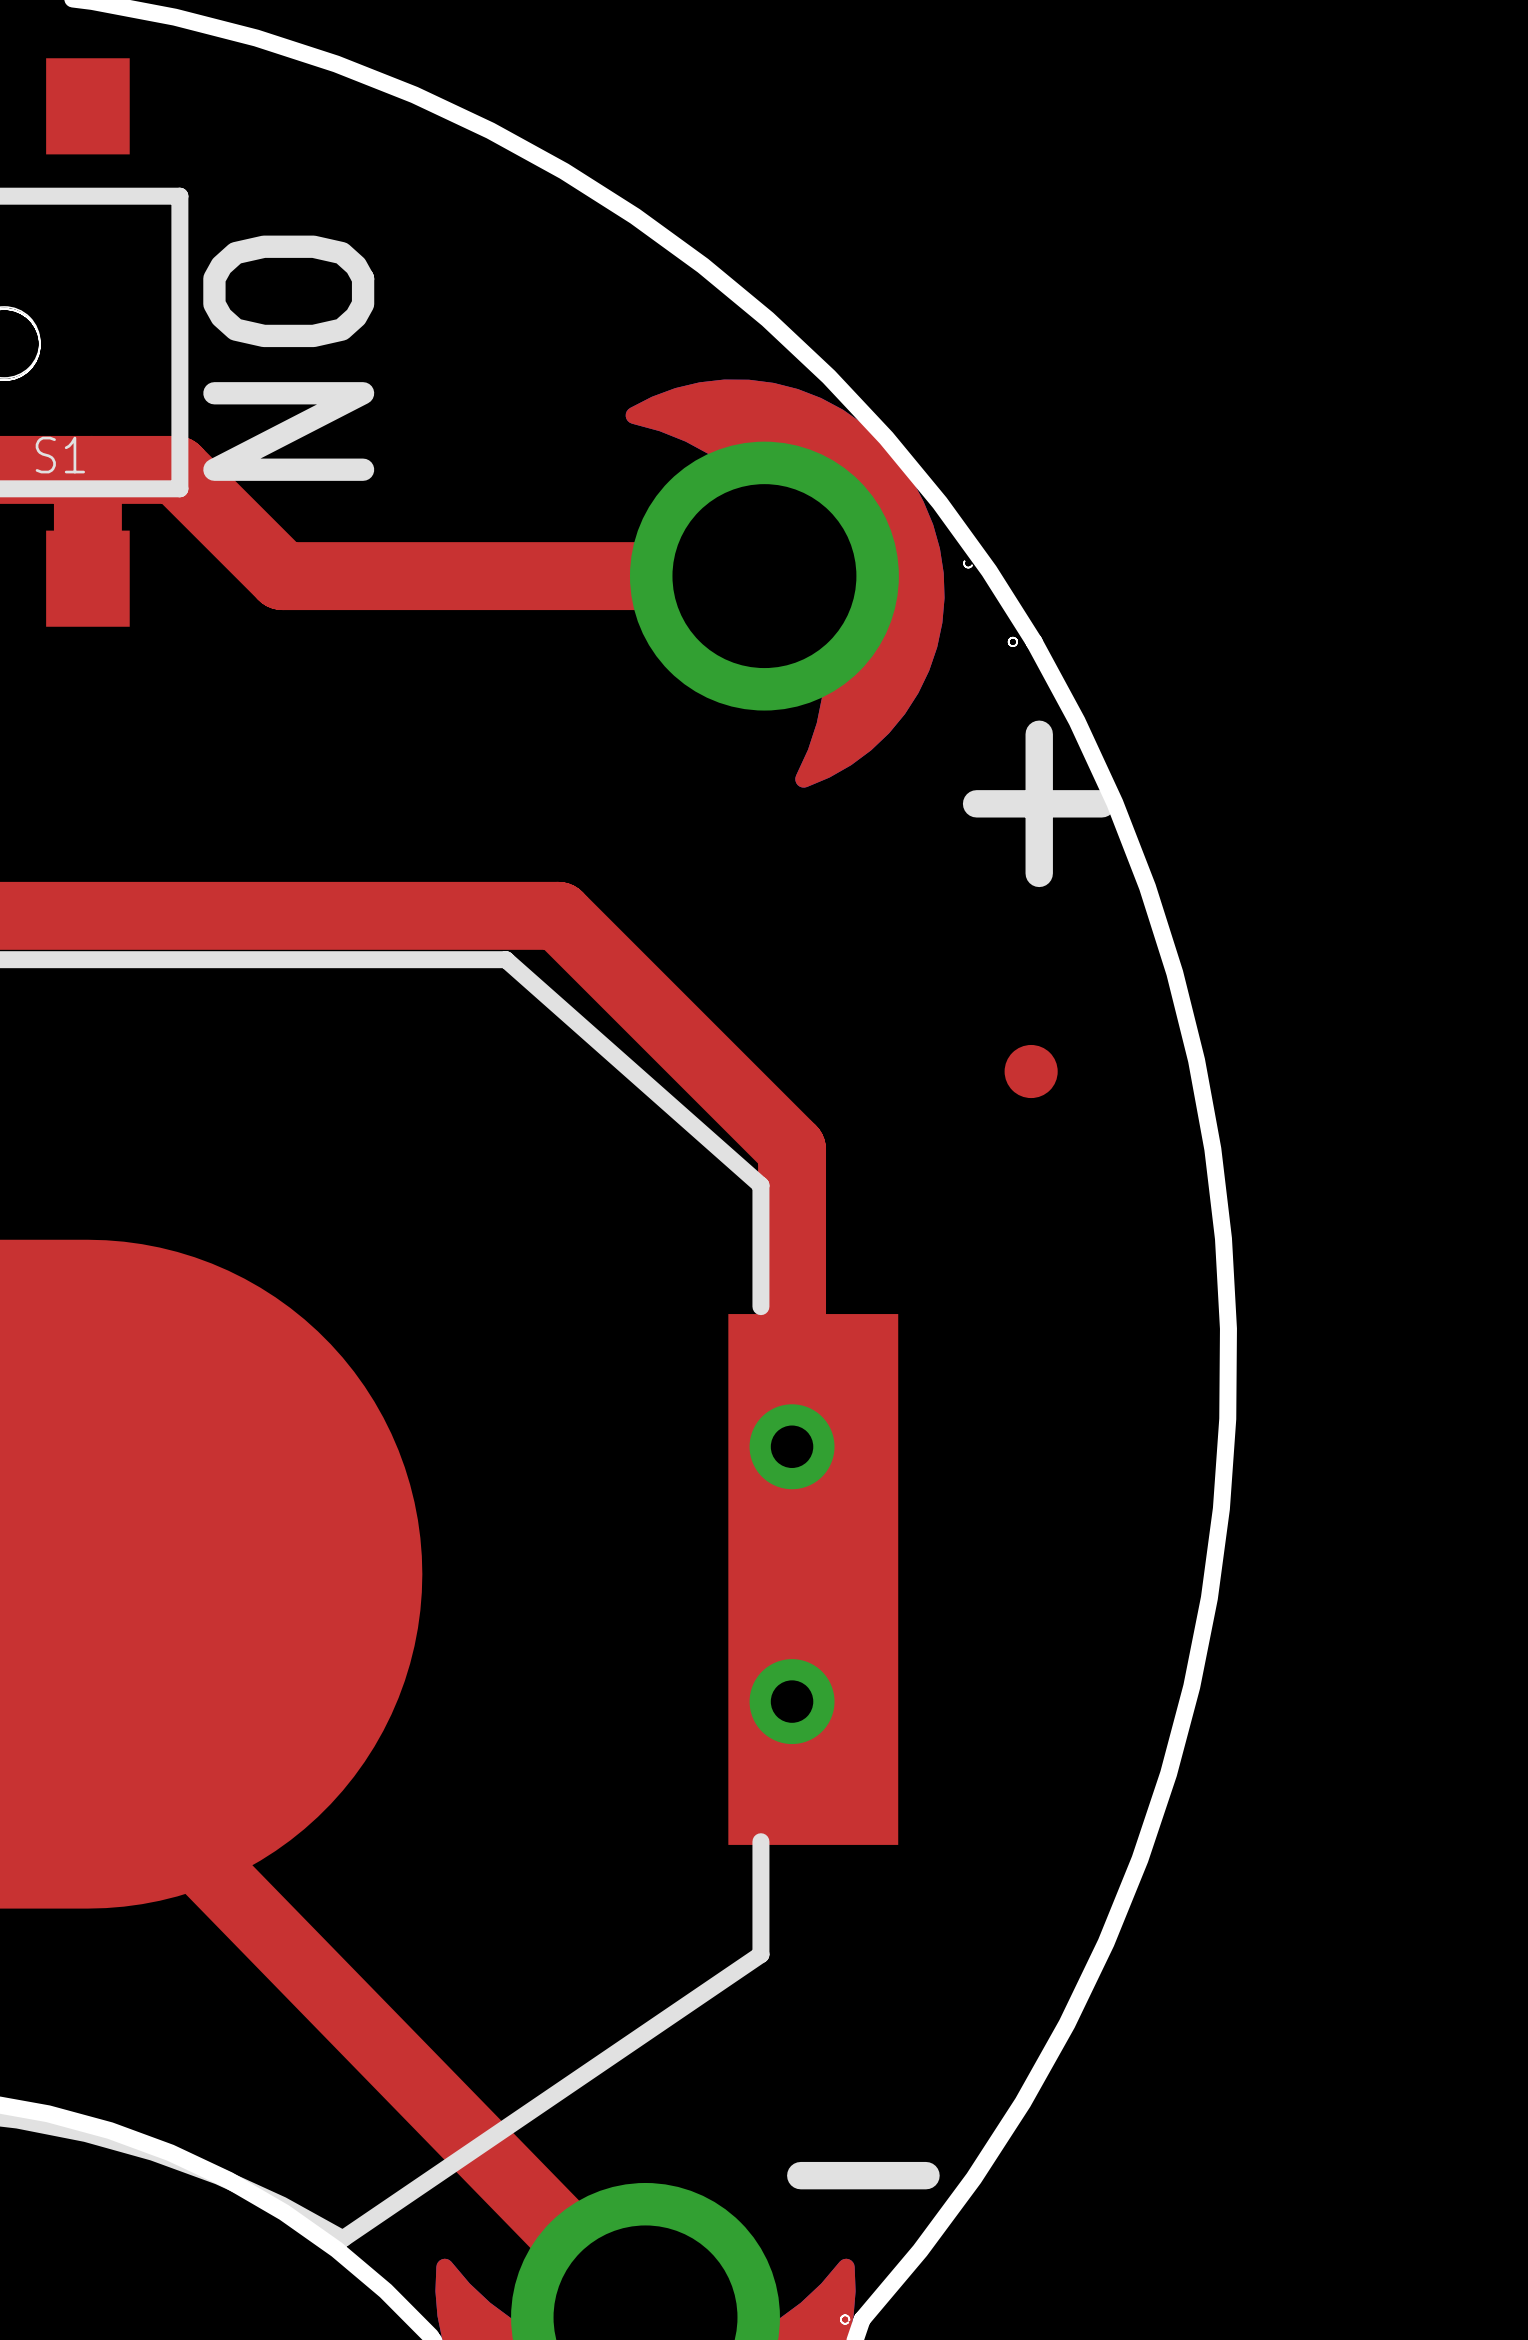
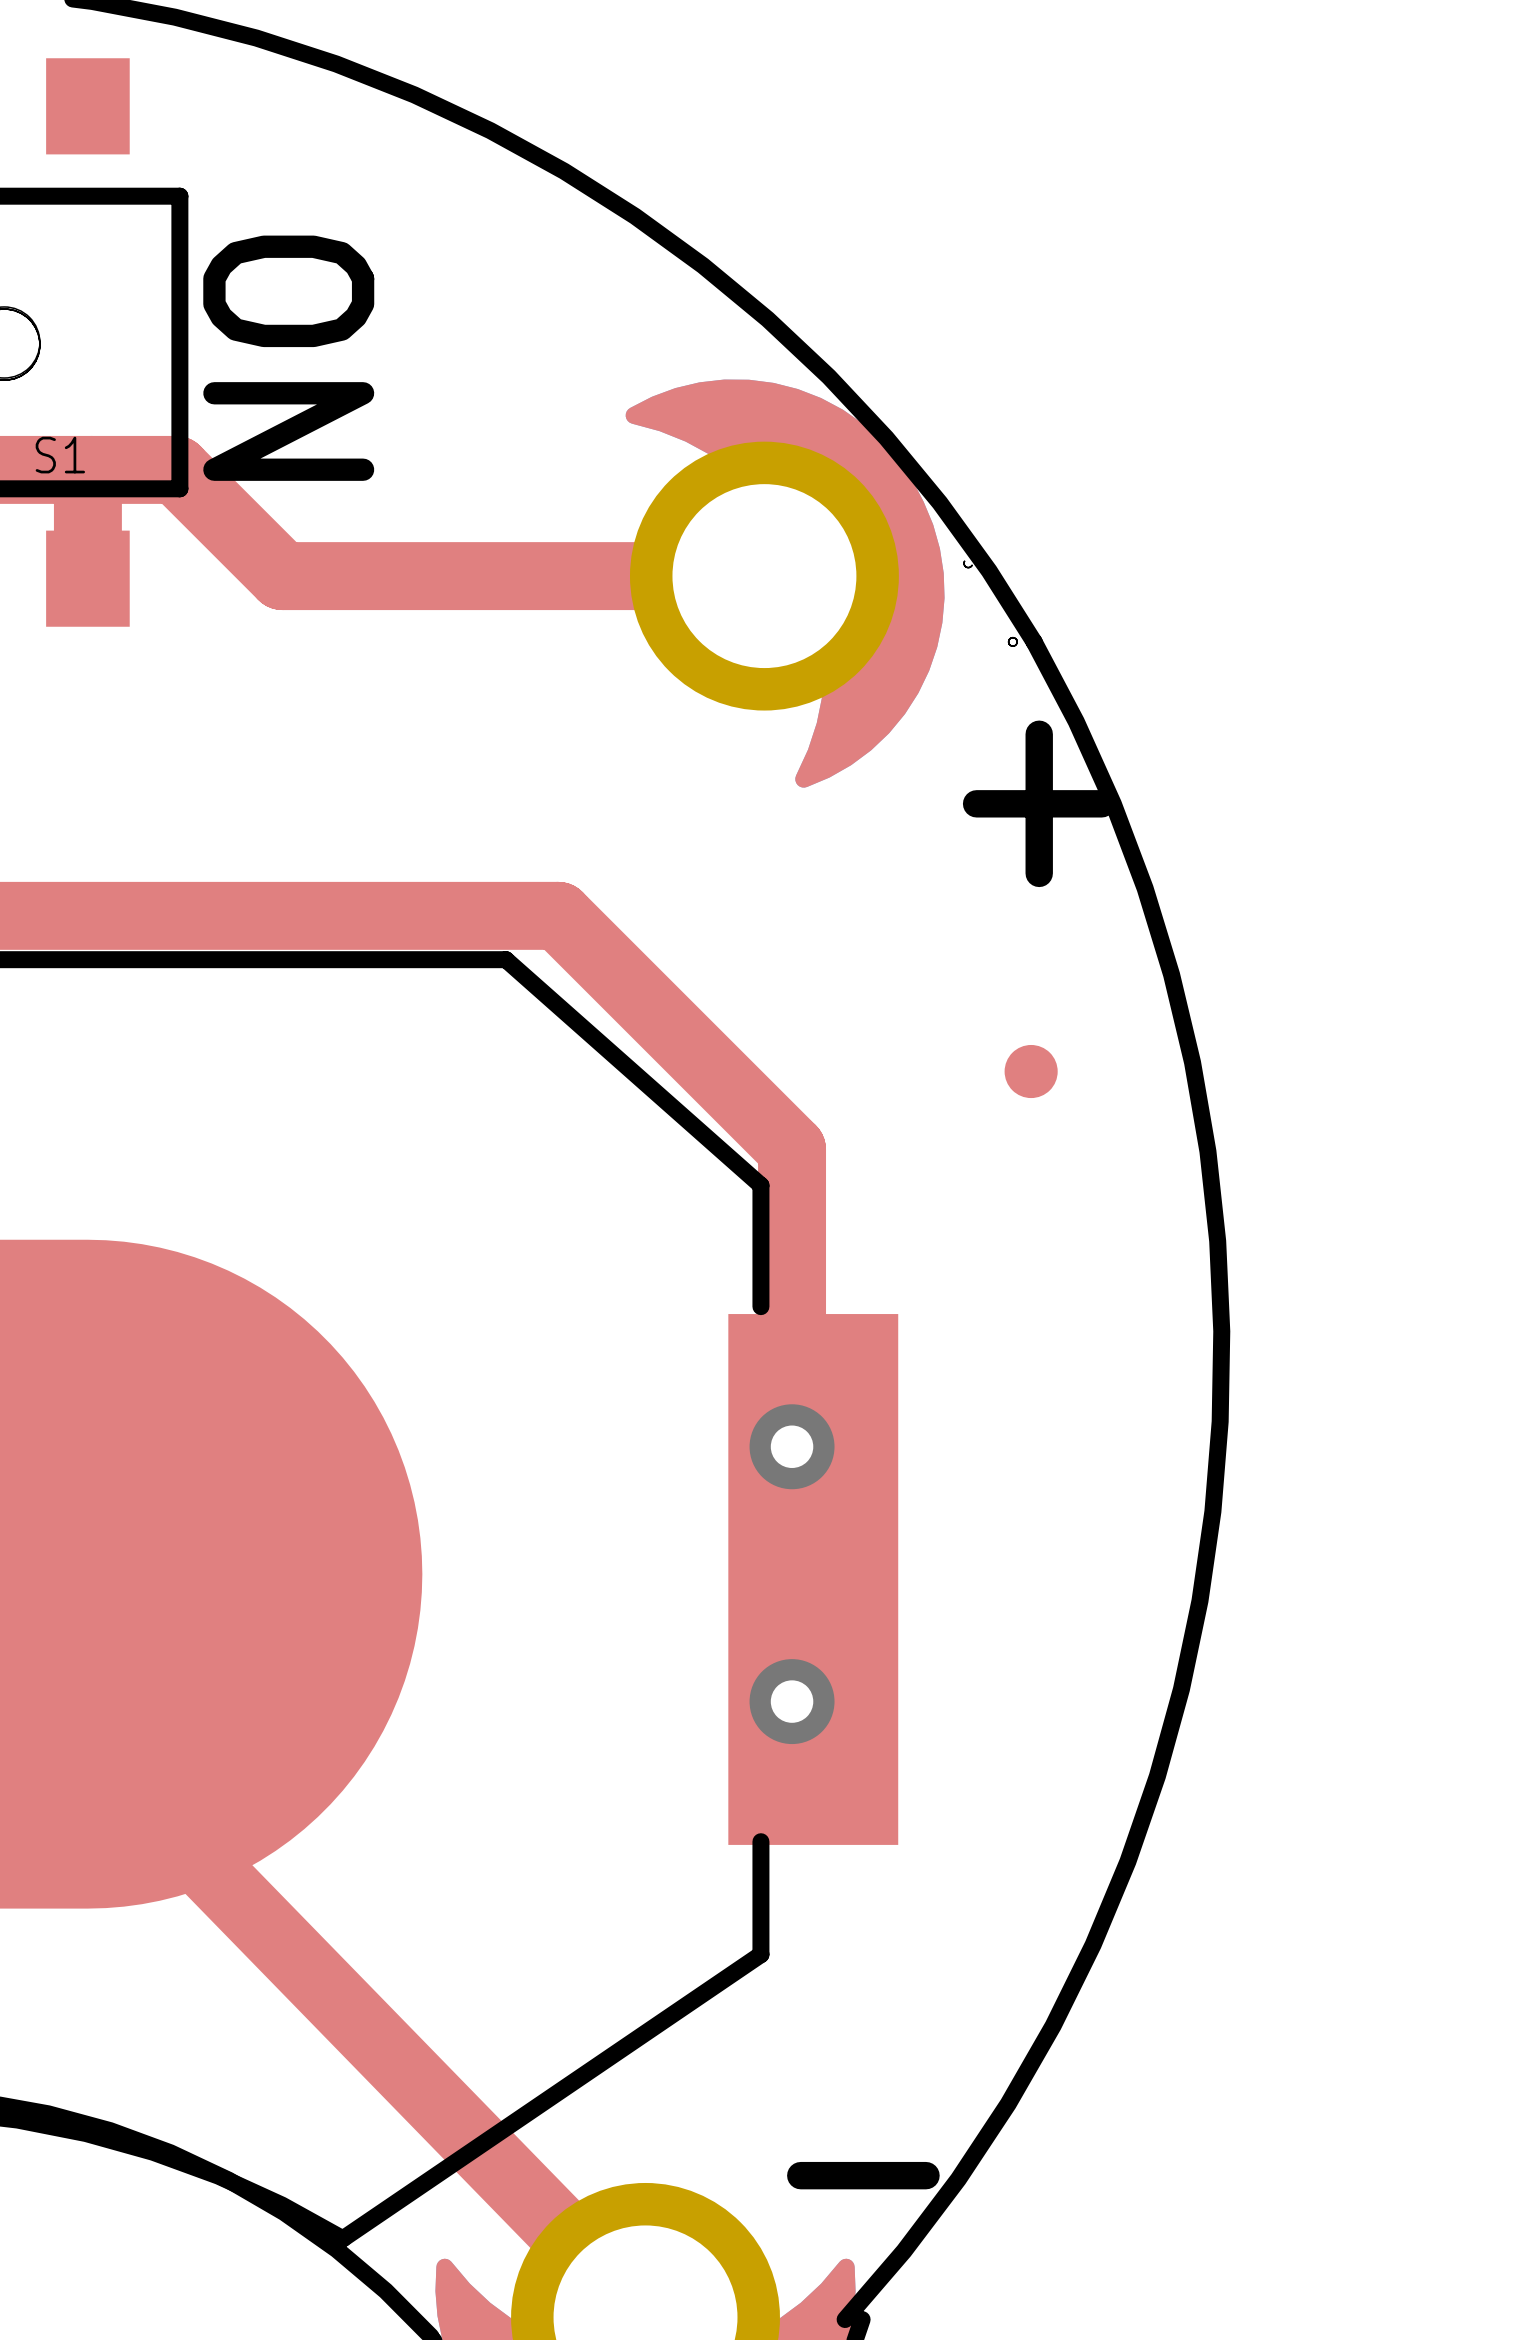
board edge: (1034, 641) (1077, 721) (1114, 803) (1147, 887) (1174, 972) (1196, 1060) (1212, 1149) (1223, 1238) (1228, 1328) (1227, 1418) (1221, 1508) (1209, 1598) (1191, 1686) (1168, 1773) (1140, 1859) (1106, 1942) (1067, 2023) (1022, 2102) (973, 2178) (920, 2250) (862, 2319) (920, 2250) (973, 2178) (1022, 2102) (1067, 2023) (1106, 1942) (1140, 1859) (1168, 1773) (1191, 1686) (1209, 1598) (1221, 1508) (1227, 1418) (1228, 1328) (1223, 1238) (1212, 1149) (1196, 1060) (1174, 972) (1147, 887) (1114, 803) (1077, 721) (1034, 641) -> (1034, 641) (1076, 721) (1113, 804) (1145, 888) (1171, 974) (1192, 1062) (1207, 1151) (1217, 1241) (1221, 1331) (1220, 1421) (1212, 1511) (1199, 1600) (1181, 1689) (1157, 1776) (1127, 1861) (1093, 1944) (1053, 2025) (1008, 2103) (958, 2179) (903, 2251) (845, 2319) (903, 2251) (958, 2179) (1008, 2103) (1053, 2025) (1093, 1944) (1127, 1861) (1157, 1776) (1181, 1689) (1199, 1600) (1212, 1511) (1220, 1421) (1221, 1331) (1217, 1241) (1207, 1151) (1192, 1062) (1171, 974) (1145, 888) (1113, 804) (1076, 721) (1034, 641)

